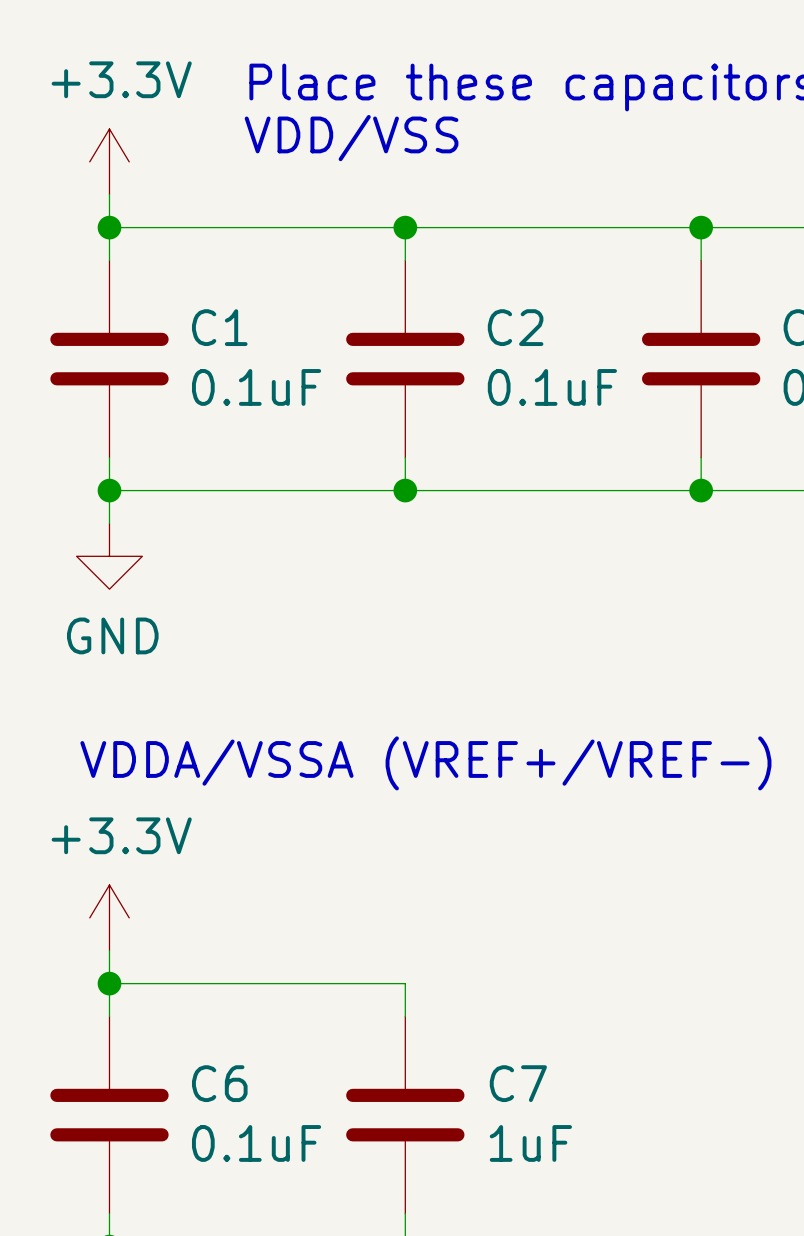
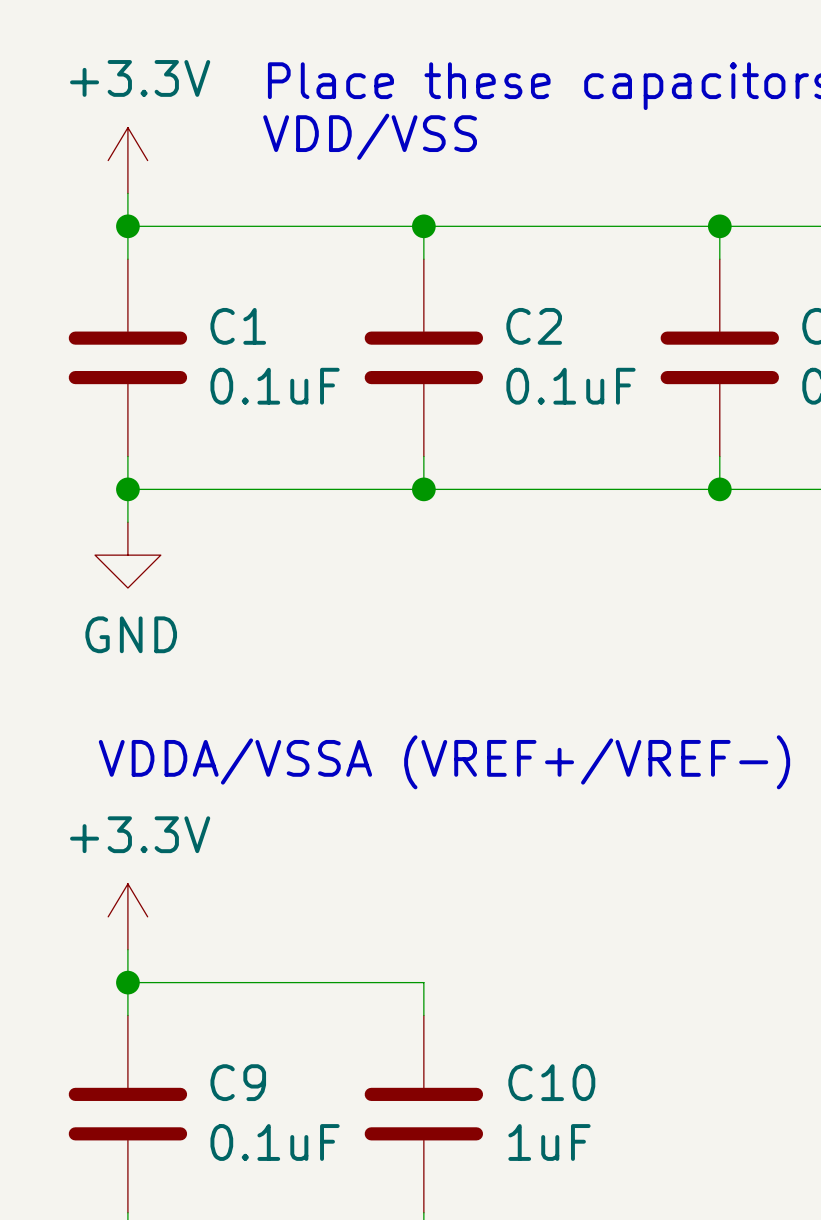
C6 name: C6 (219, 1083) -> C9 (238, 1082)
C7 name: C7 (518, 1083) -> C10 (551, 1082)

